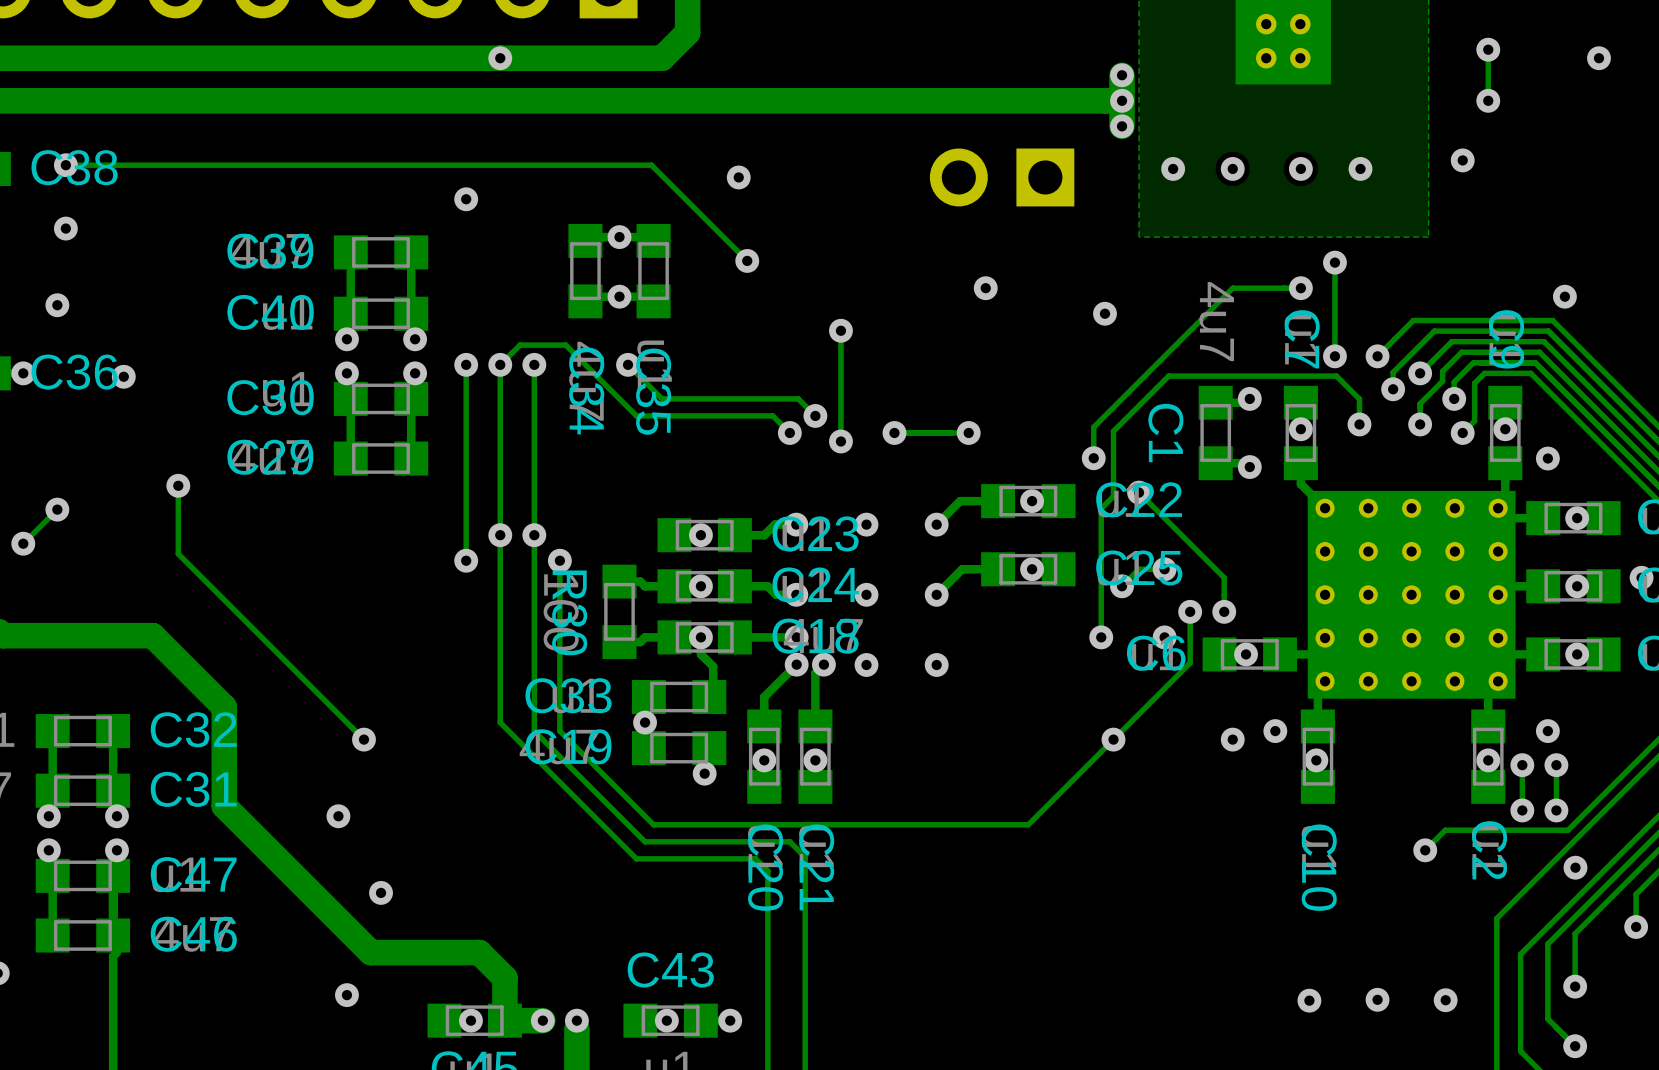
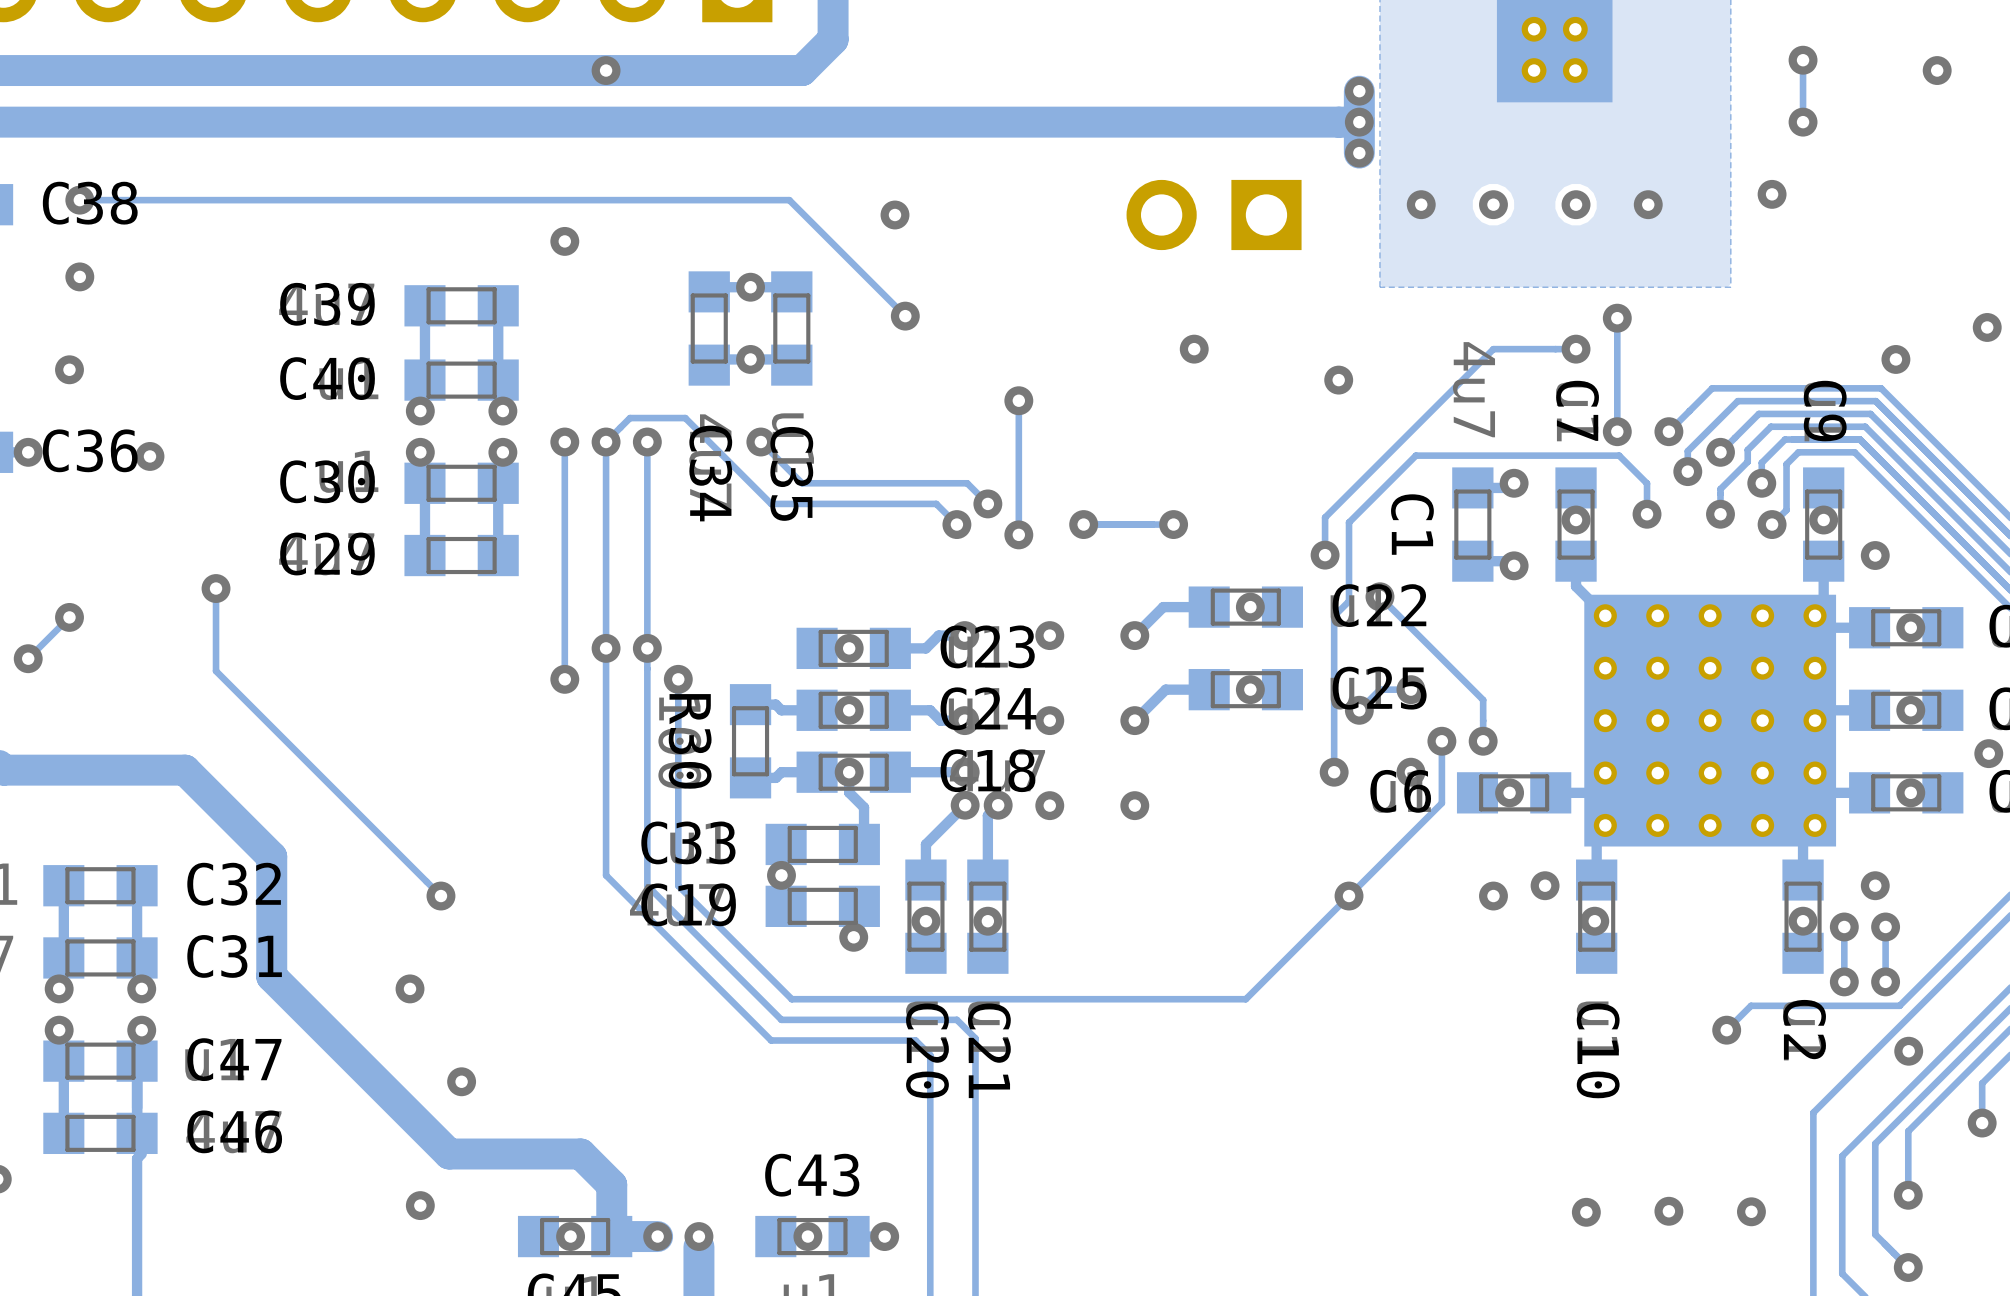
via: none -> (1987, 327)
via position: (1641, 577) -> (1988, 753)

